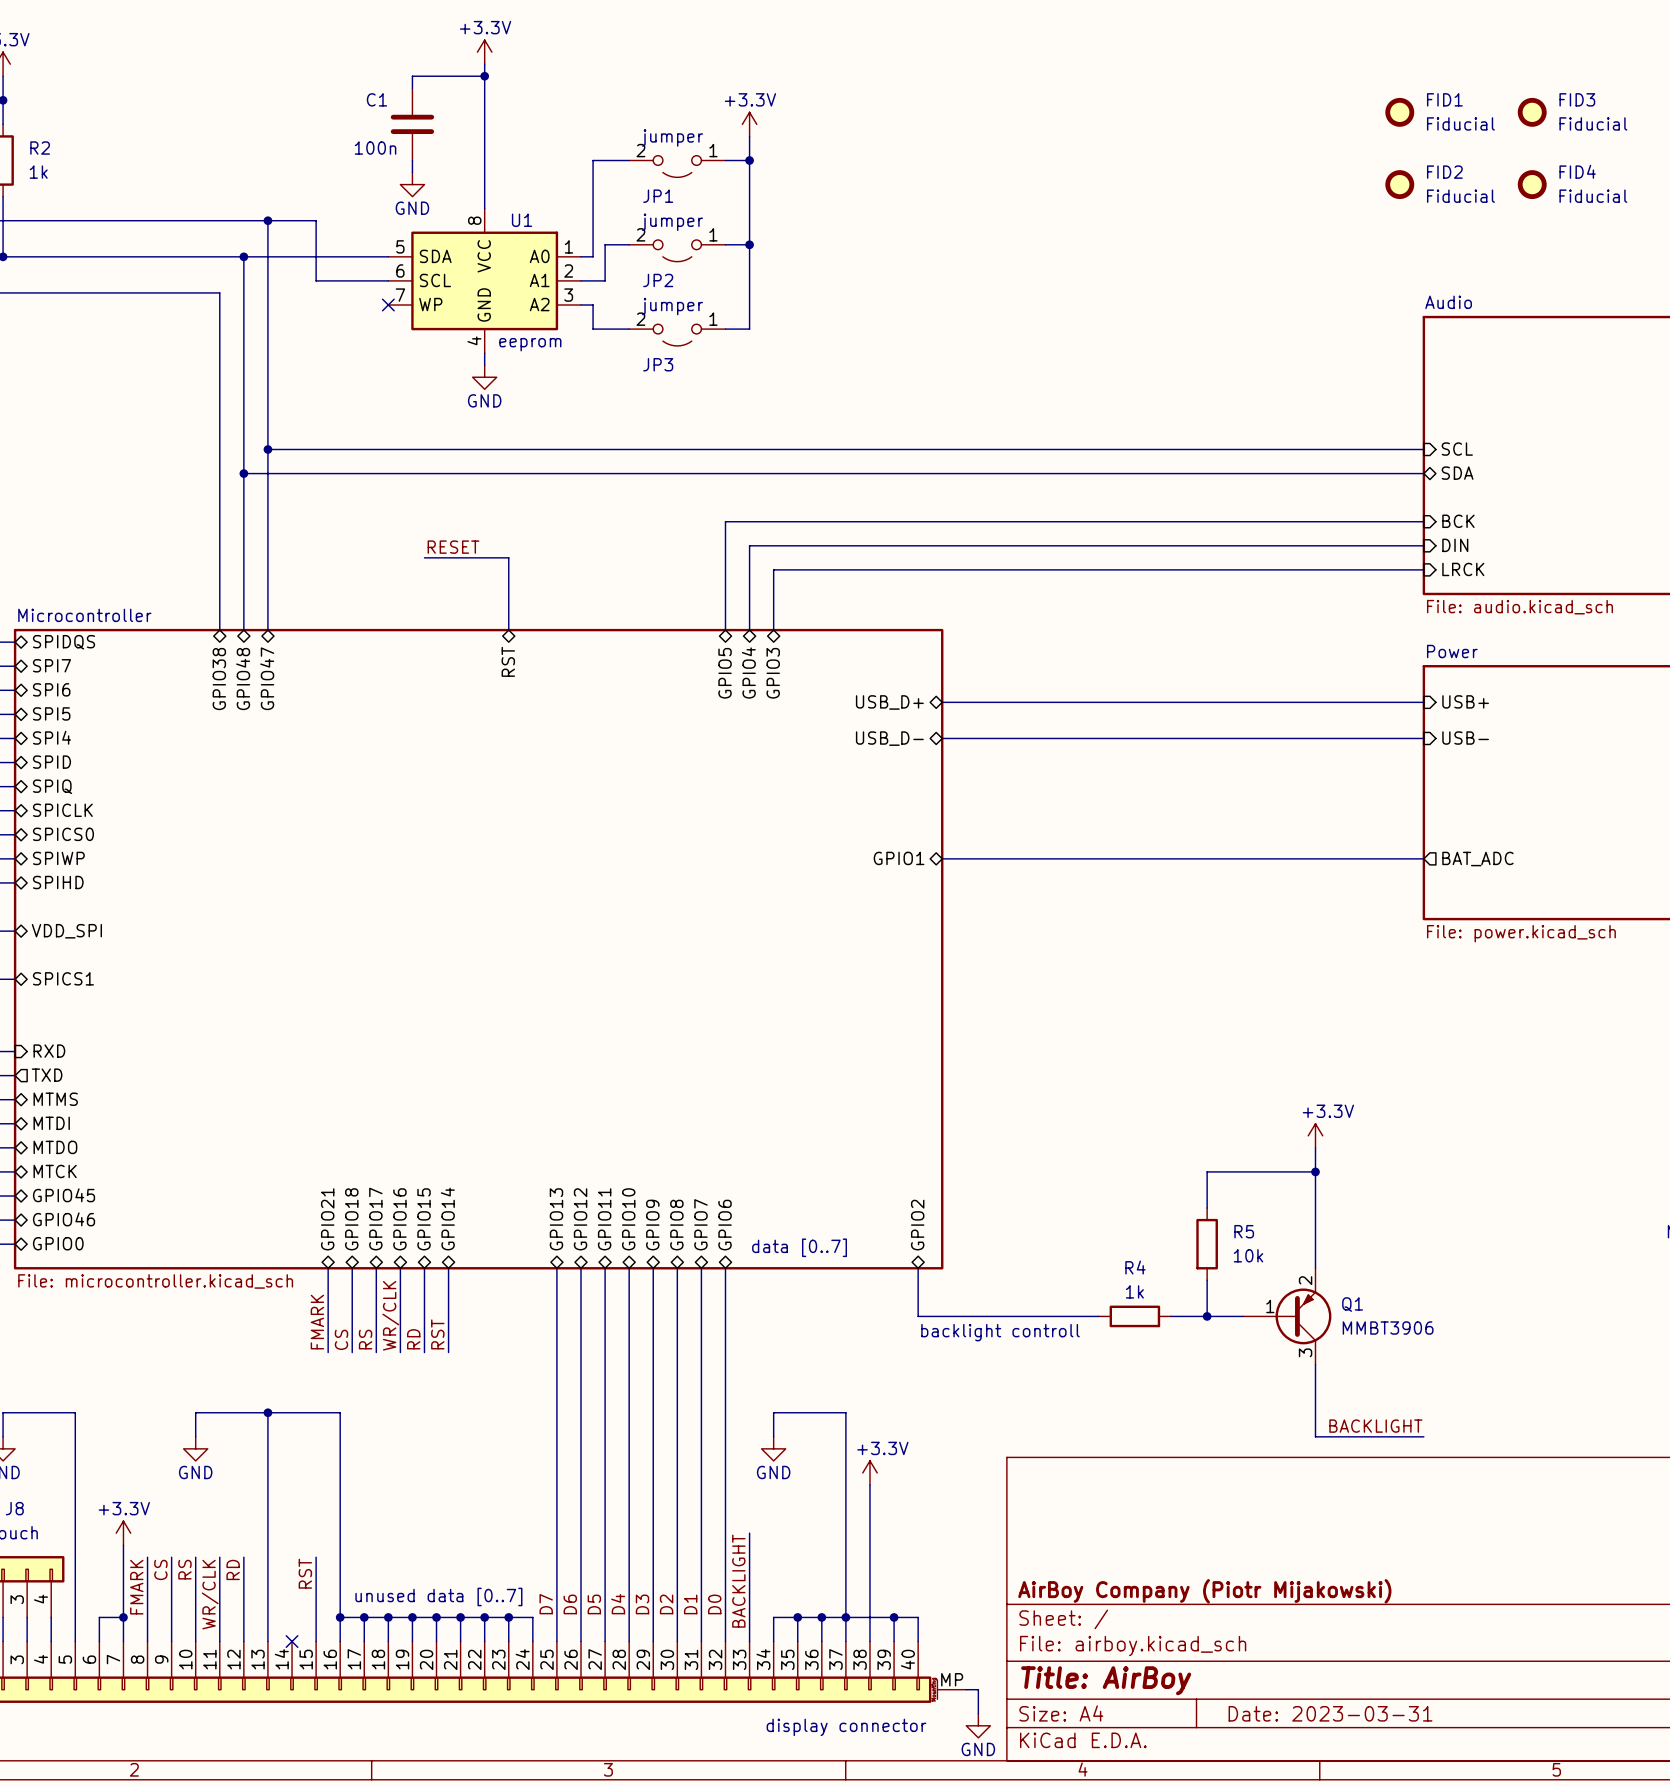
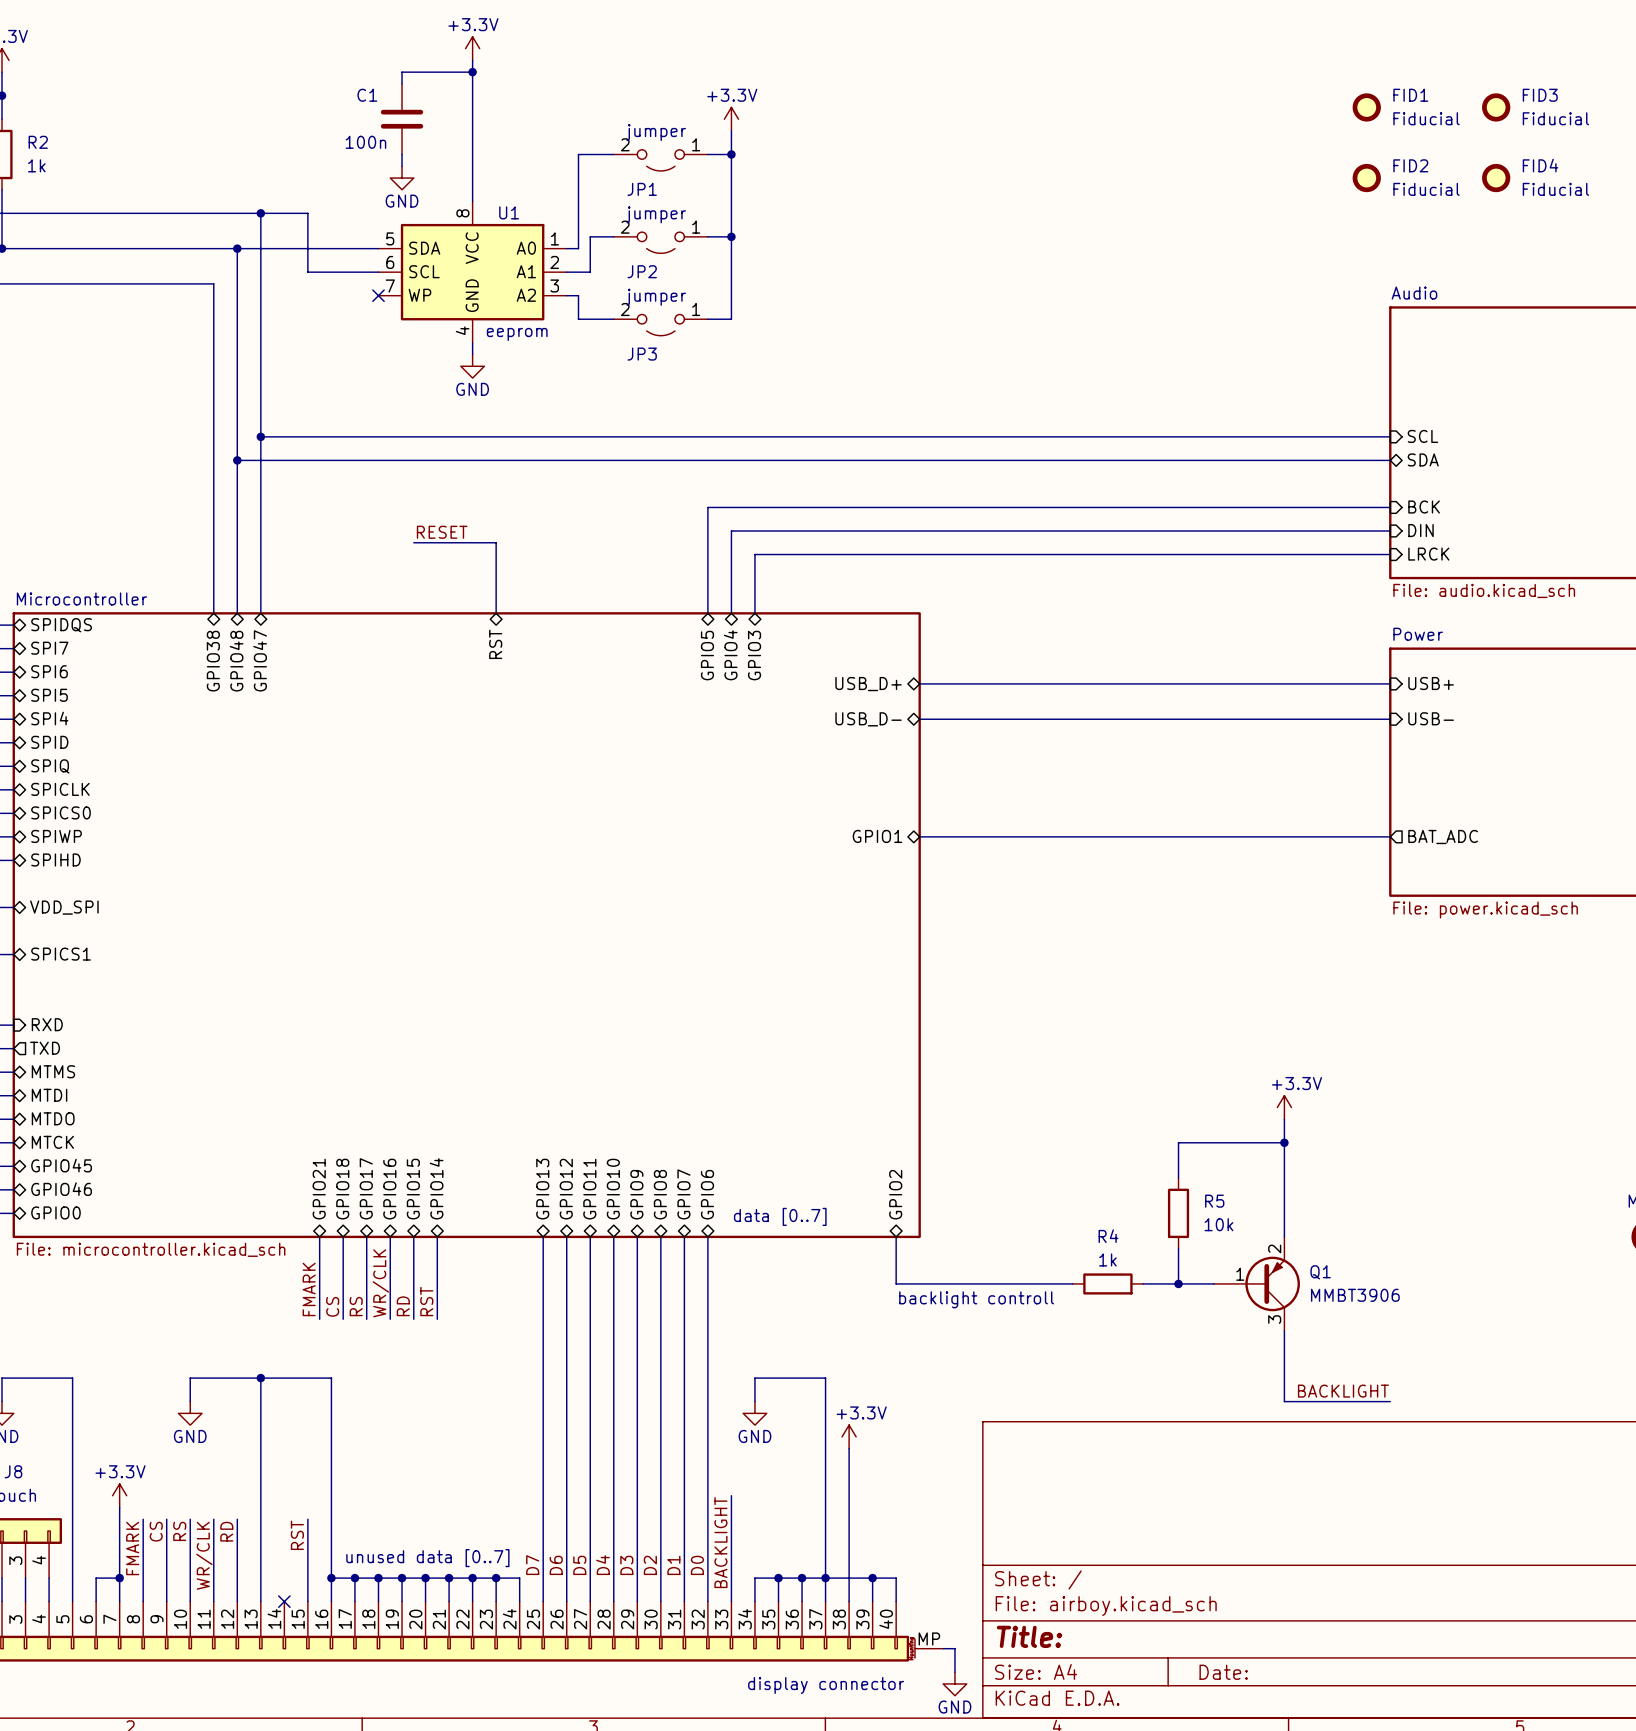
title block: AirBoy Company (Piotr Mijakowski) (1204, 1591) -> none
title block: Title: AirBoy (1106, 1680) -> Title: (1029, 1636)
title block: Date: 2023-03-31 (1330, 1713) -> Date: (1223, 1672)

